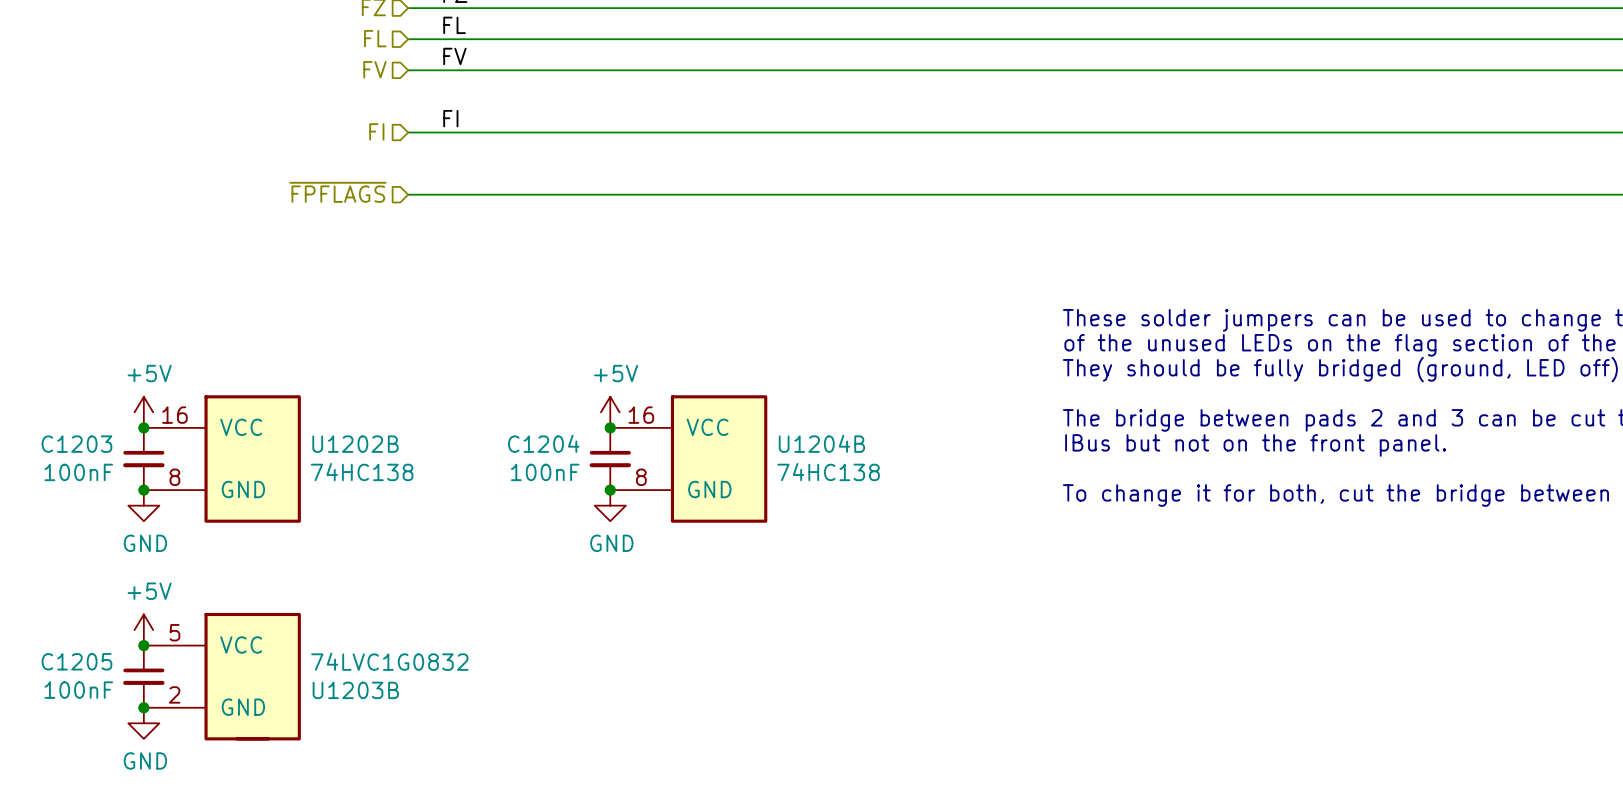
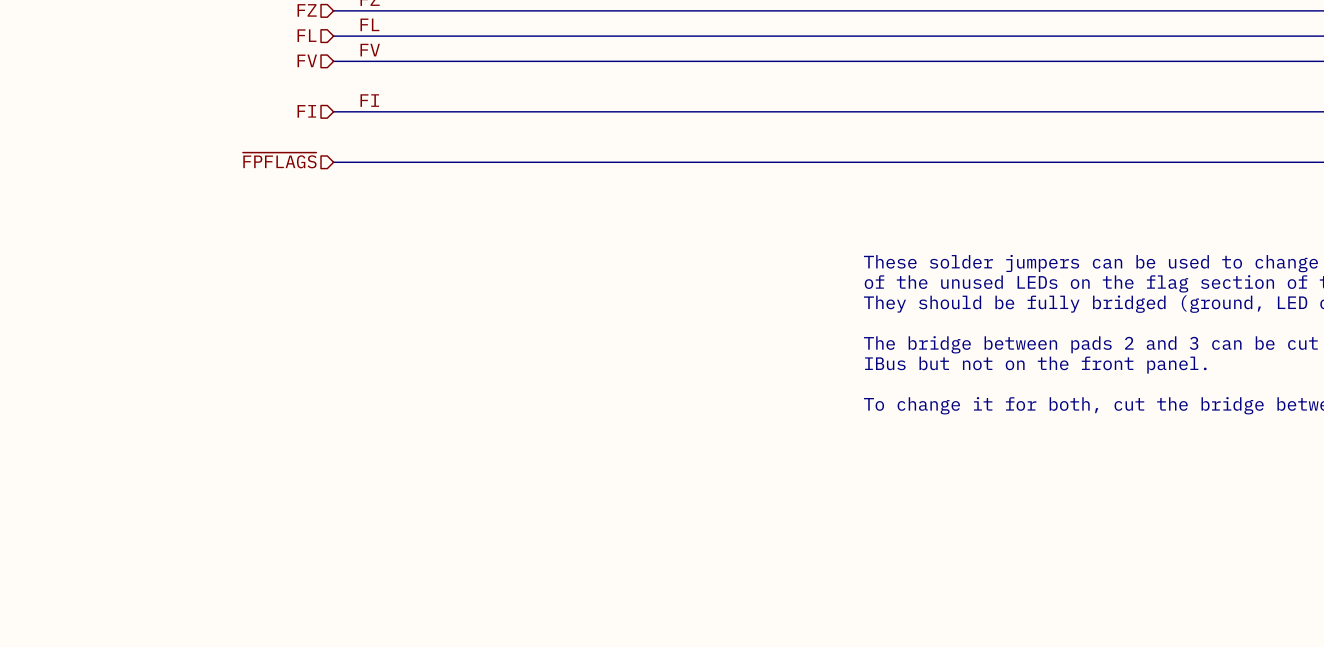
power symbol: +5V (143, 412) -> none
power symbol: +5V (610, 412) -> none
junction: (143, 427) -> none
junction: (610, 427) -> none
C1203: 100nF (143, 459) -> none
U1202B: 74HC138 (222, 459) -> none
C1204: 100nF (610, 459) -> none
U1204B: 74HC138 (688, 459) -> none
junction: (143, 490) -> none
junction: (610, 490) -> none
power symbol: GND (143, 505) -> none
power symbol: GND (610, 505) -> none
power symbol: +5V (143, 630) -> none
junction: (143, 645) -> none
C1205: 100nF (143, 676) -> none
U1203B: 74LVC1G0832 (222, 676) -> none
junction: (143, 707) -> none
power symbol: GND (143, 723) -> none

